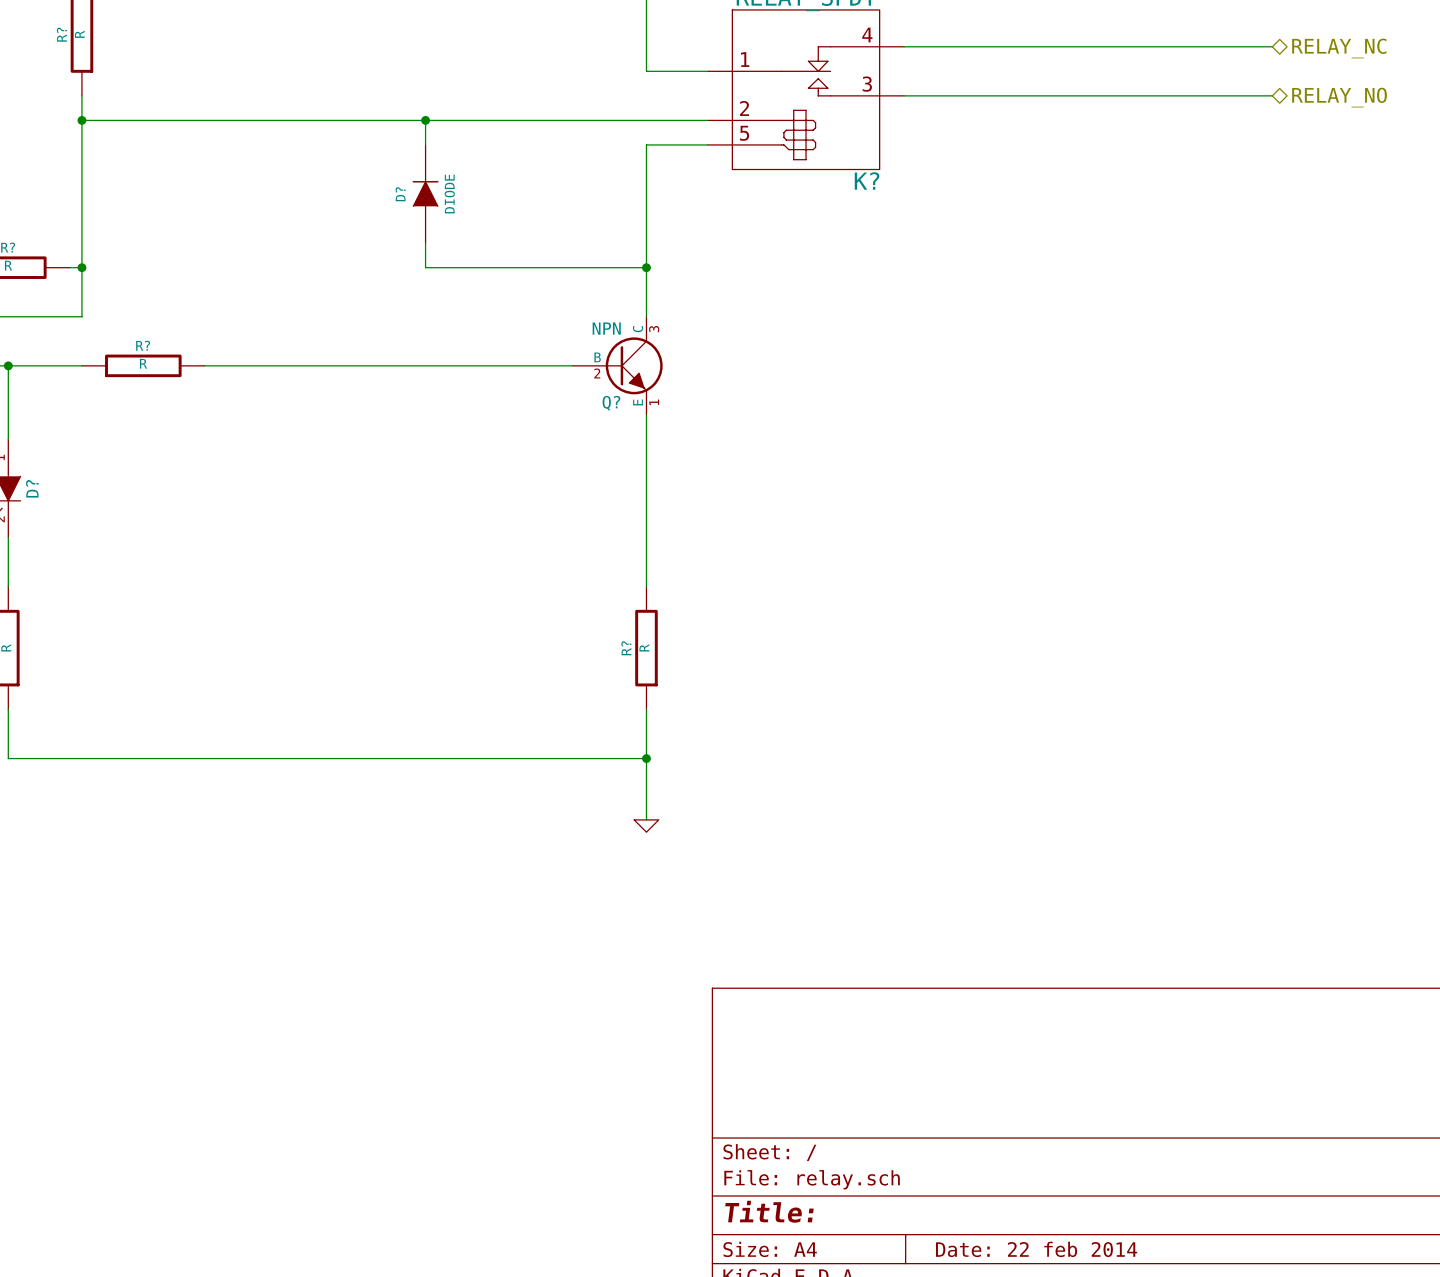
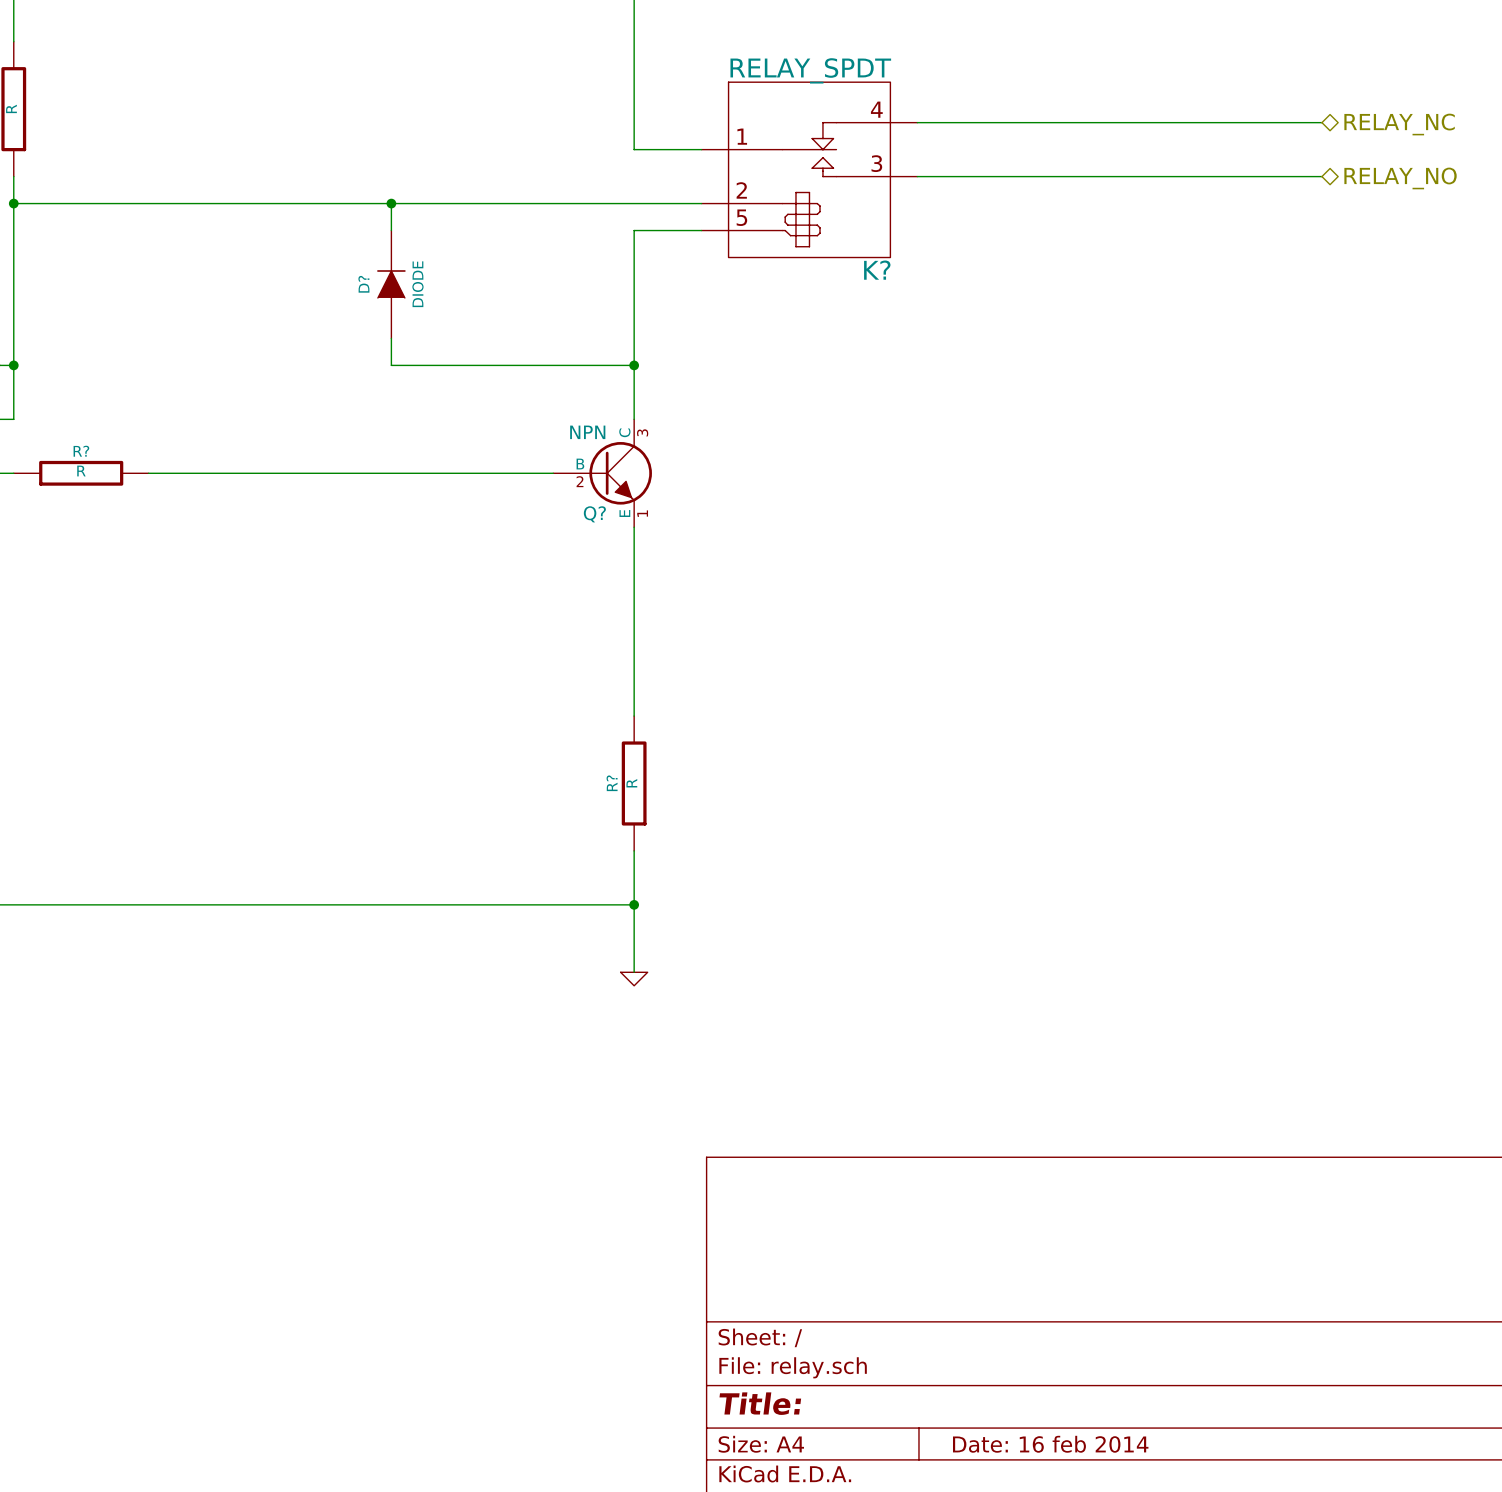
title block: Date: 22 feb 2014 (1036, 1249) -> Date: 16 feb 2014 (1050, 1444)

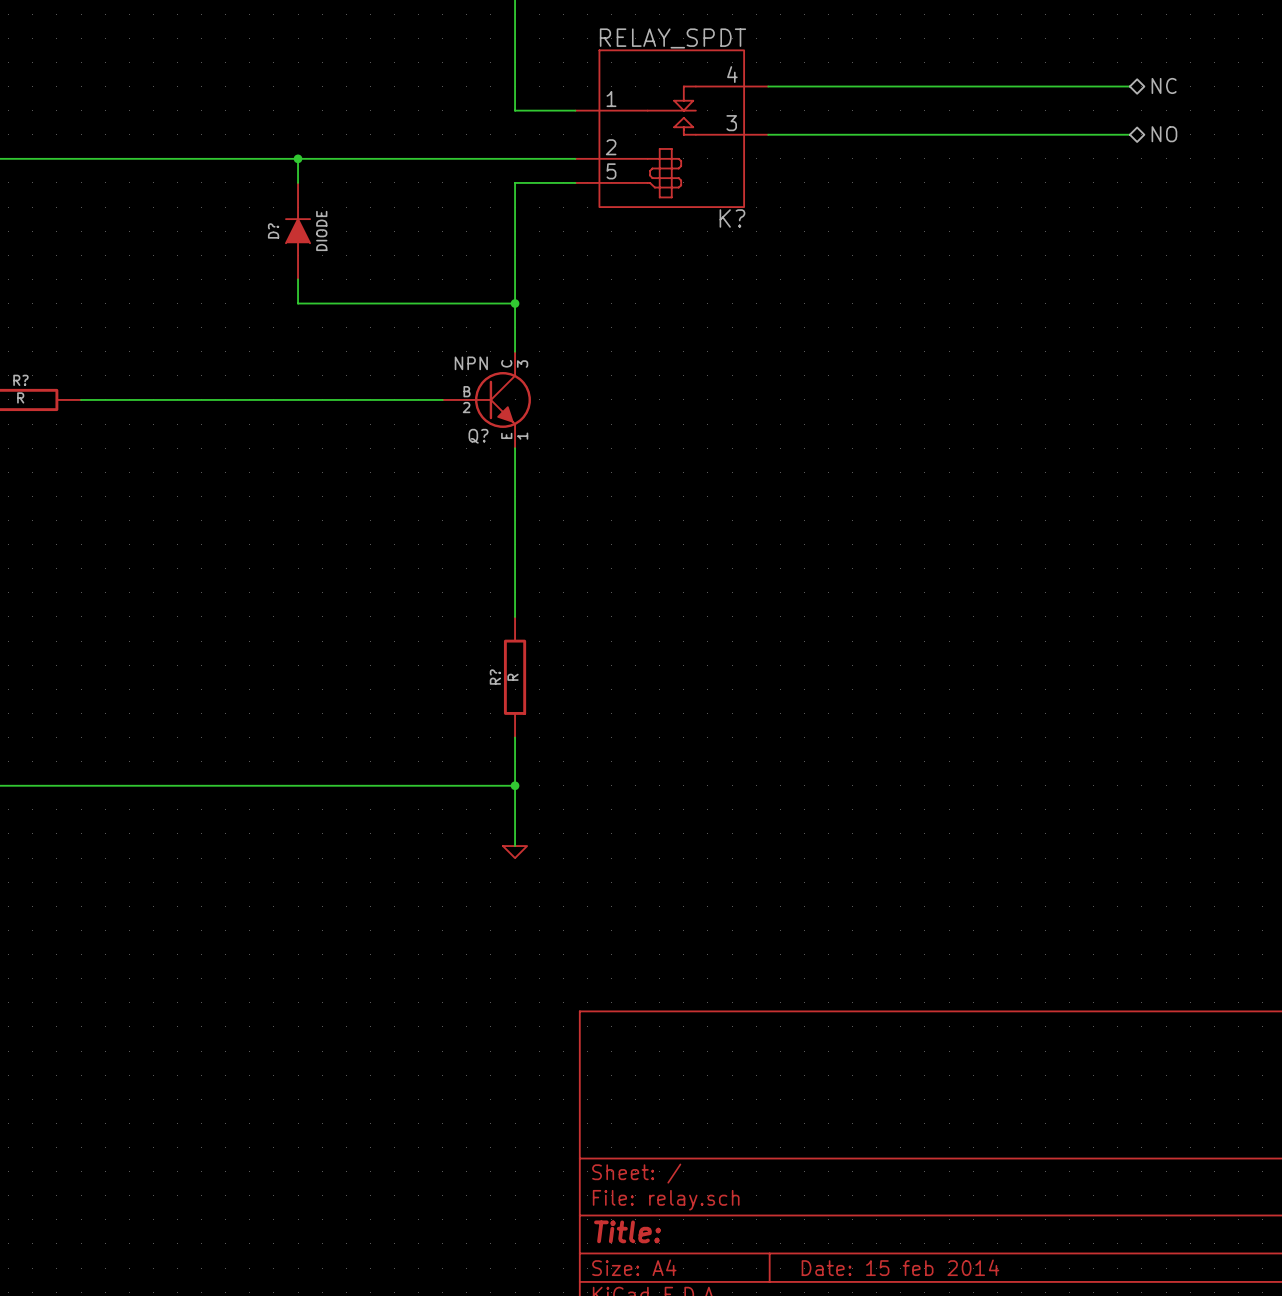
hierarchical label: RELAY_NC (1399, 124) -> NC (1164, 85)
hierarchical label: RELAY_NO (1400, 178) -> NO (1164, 134)
title block: Date: 16 feb 2014 (1050, 1444) -> Date: 15 feb 2014 (900, 1267)

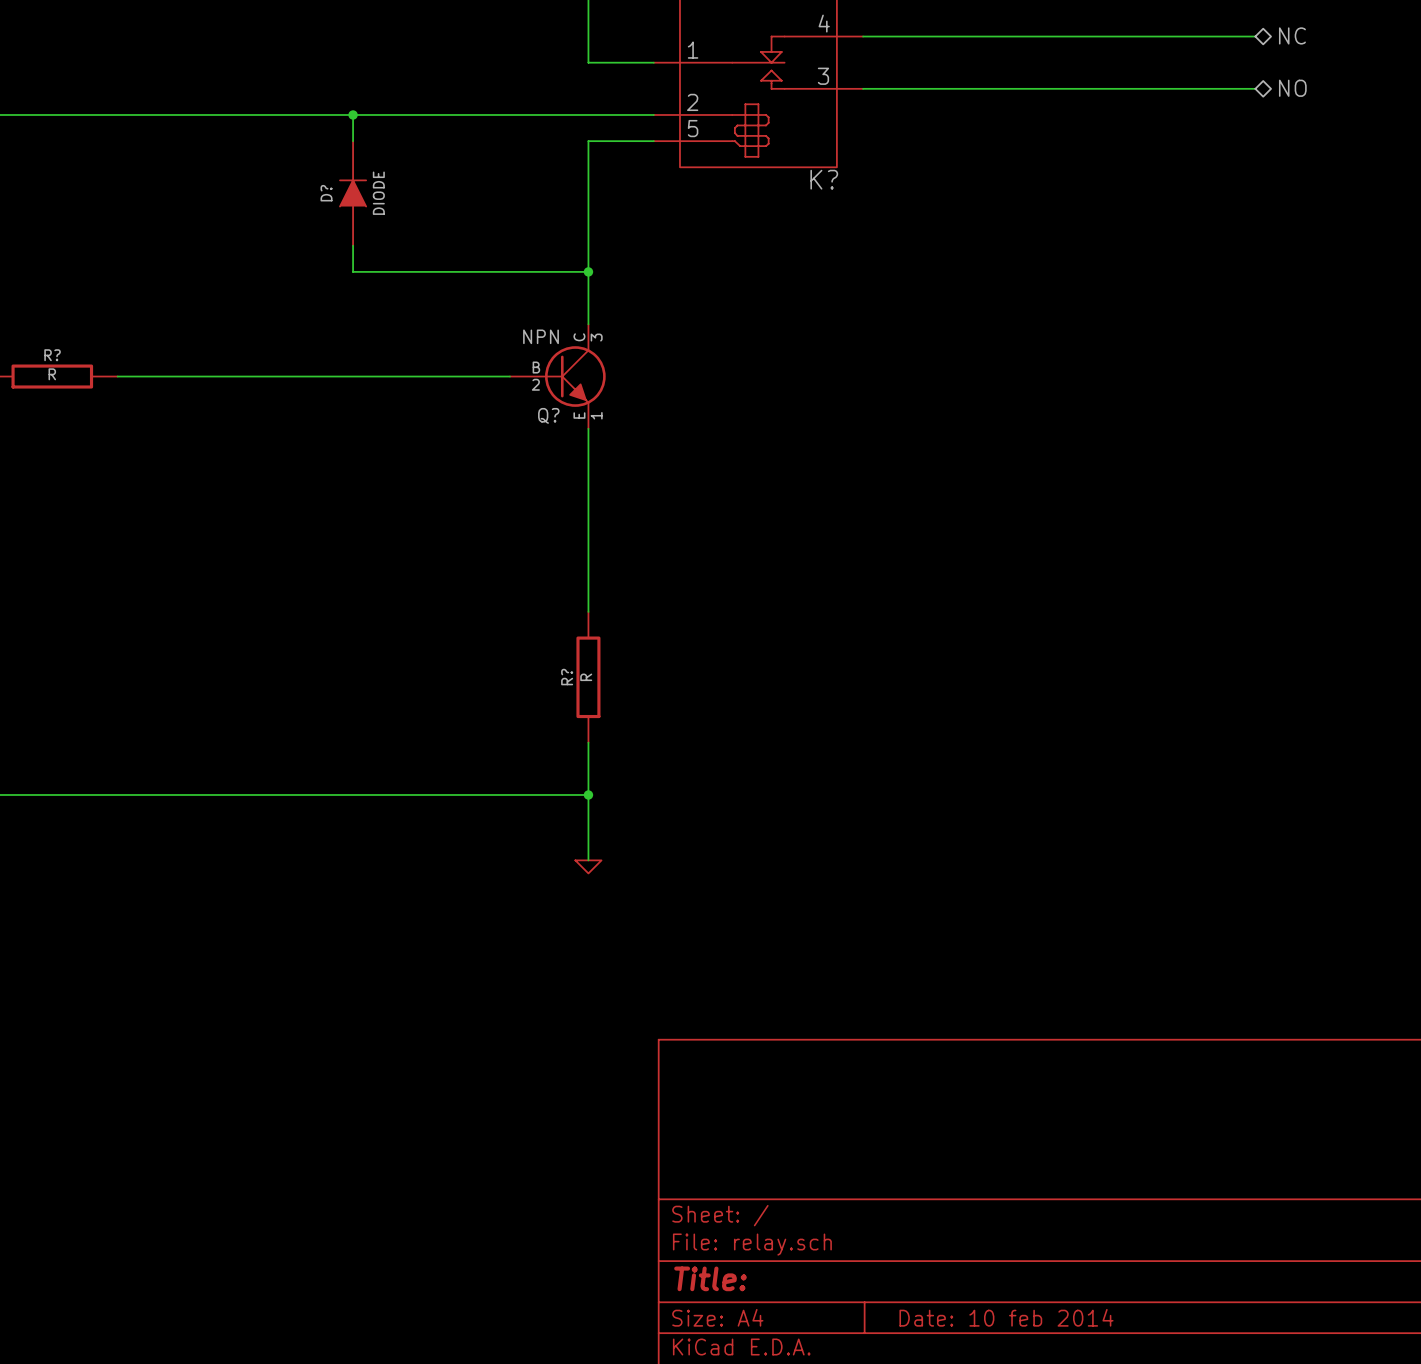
title block: Date: 15 feb 2014 (900, 1267) -> Date: 10 feb 2014 (1006, 1317)

